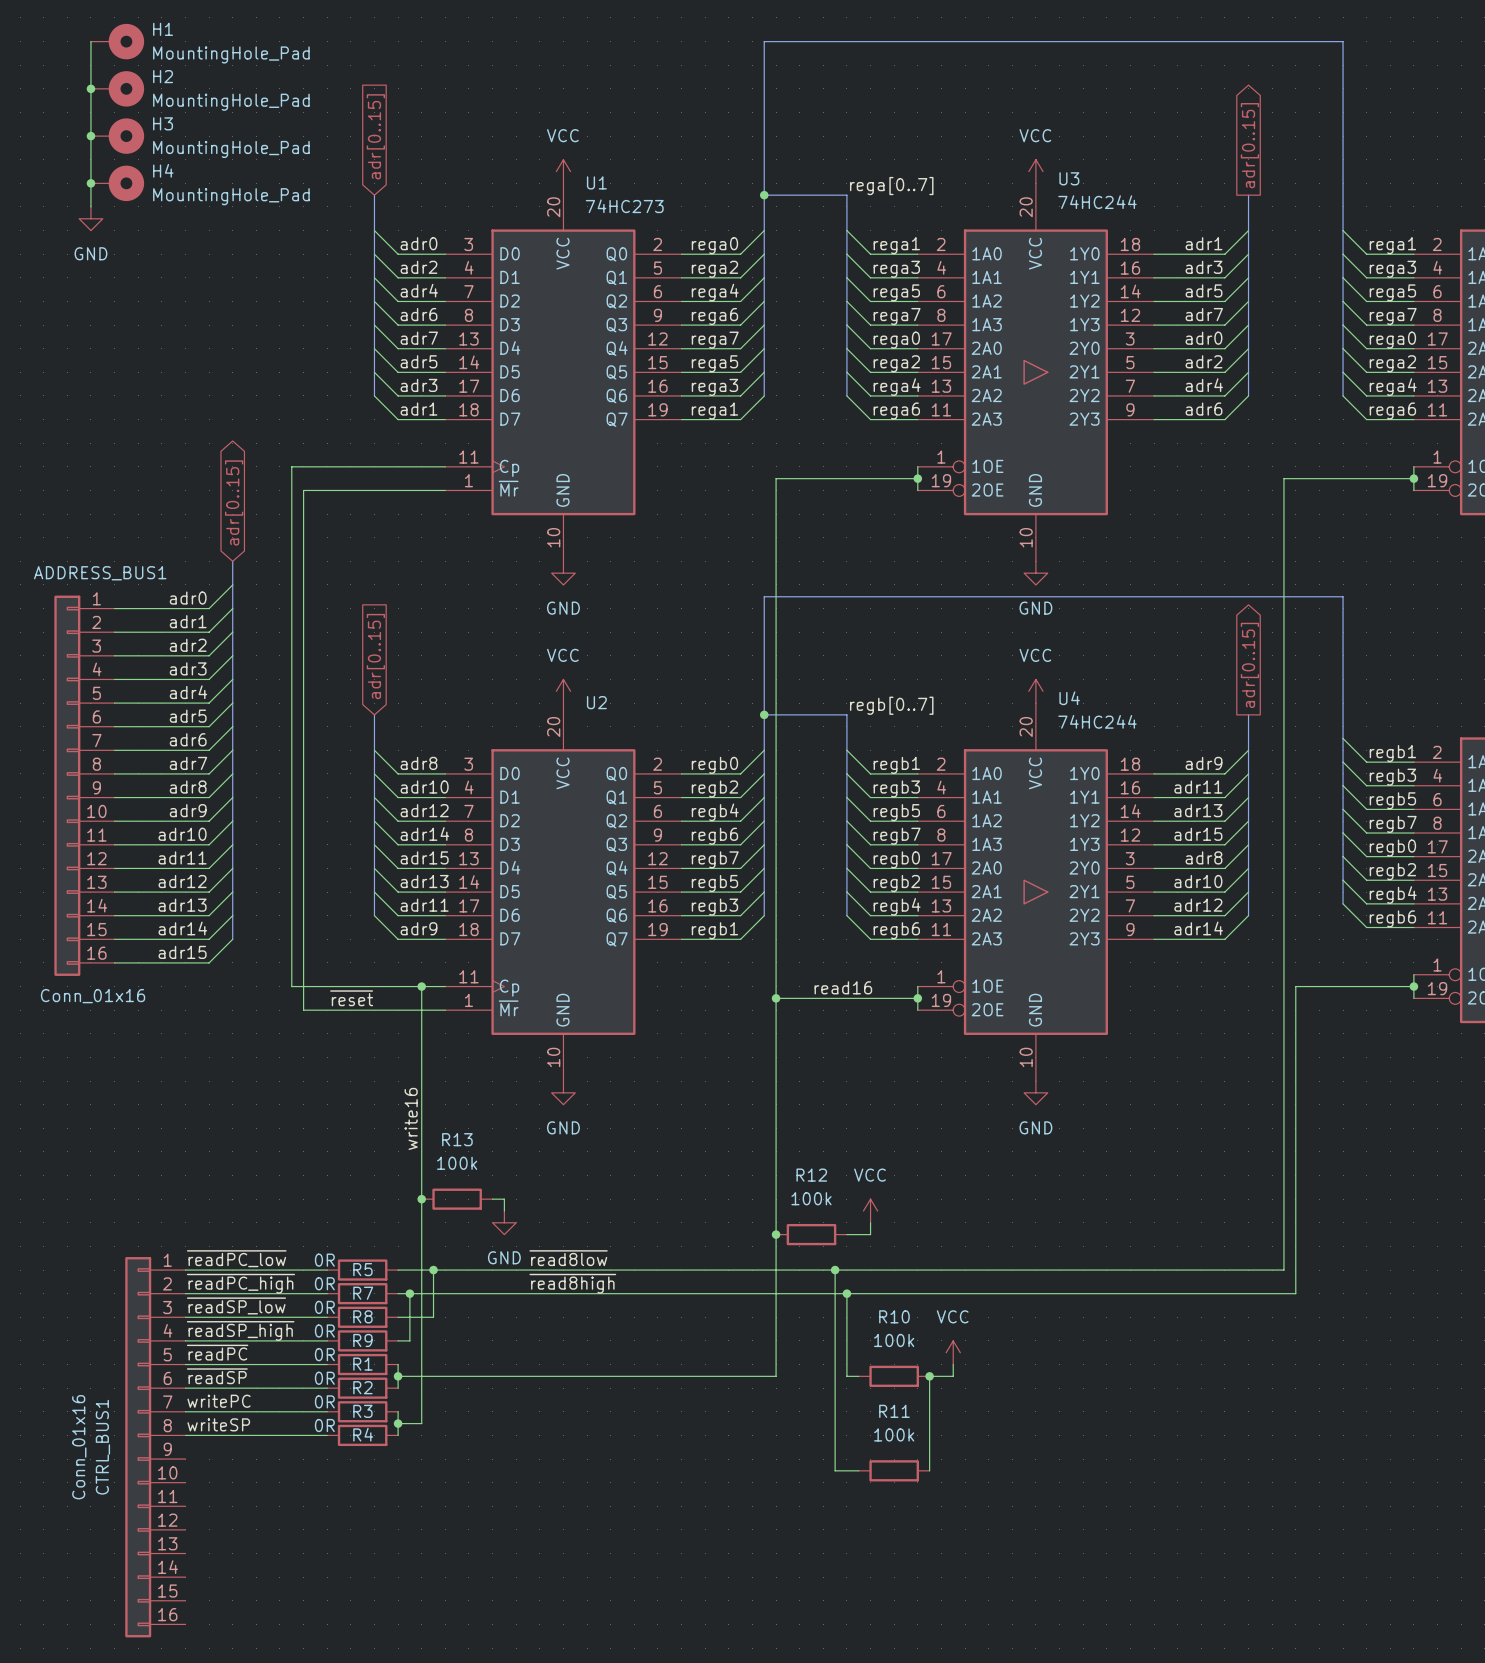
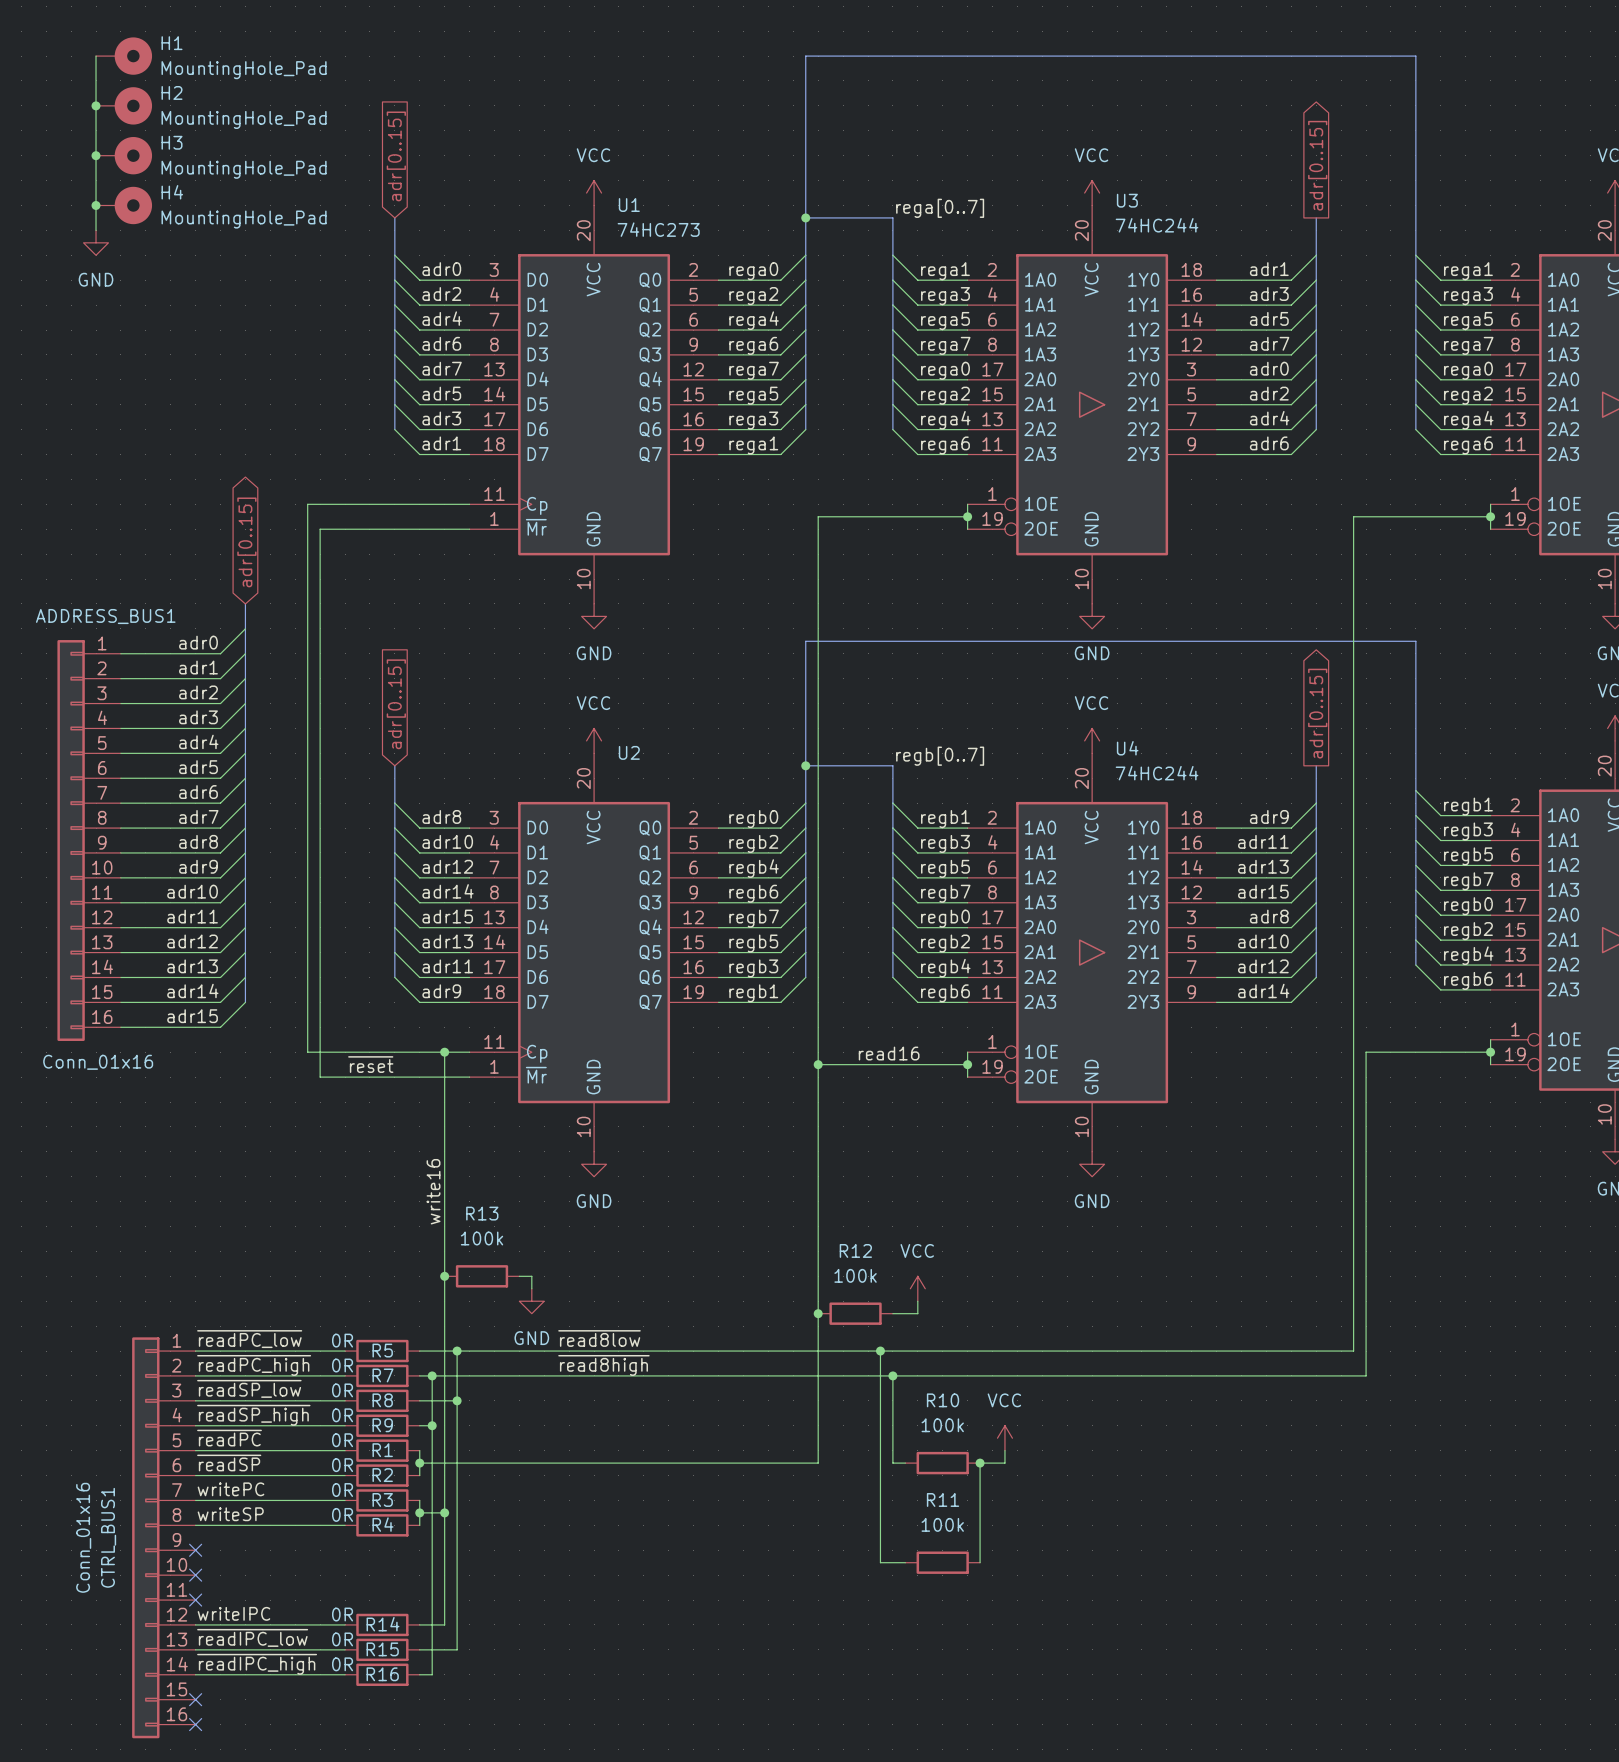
wire: none -> (457, 1400) (457, 1649) (419, 1649)
junction: none -> (457, 1400)
wire: none -> (432, 1425) (432, 1674) (419, 1674)
junction: none -> (432, 1425)
wire: none -> (444, 1512) (444, 1624) (419, 1624)
junction: none -> (444, 1512)
no-connect mark: none -> (195, 1550)
no-connect mark: none -> (195, 1575)
no-connect mark: none -> (195, 1600)
label: none -> writeIPC (233, 1613)
wire: none -> (195, 1624) (345, 1624)
R14: none -> 0R (382, 1624)
label: none -> ~{readIPC_low} (252, 1637)
wire: none -> (195, 1649) (345, 1649)
R15: none -> 0R (382, 1649)
label: none -> ~{readIPC_high} (257, 1664)
wire: none -> (195, 1674) (345, 1674)
R16: none -> 0R (382, 1674)
no-connect mark: none -> (195, 1699)
no-connect mark: none -> (195, 1724)

